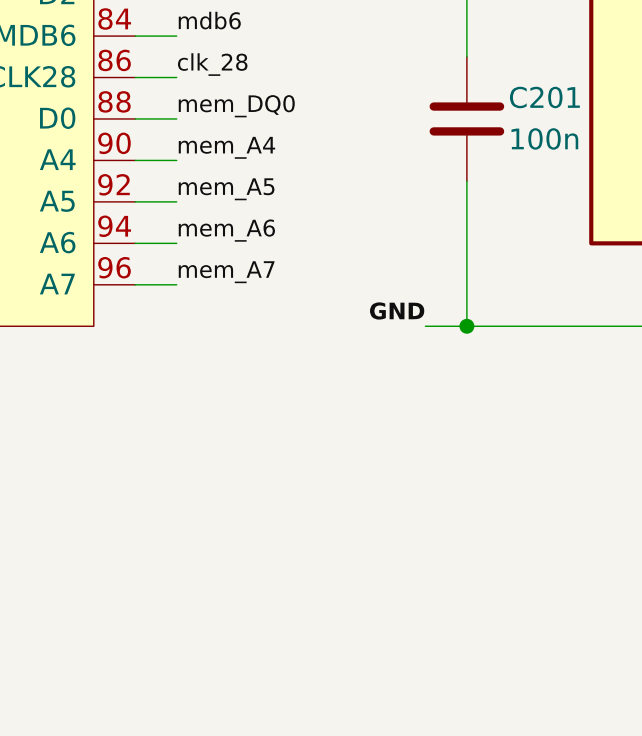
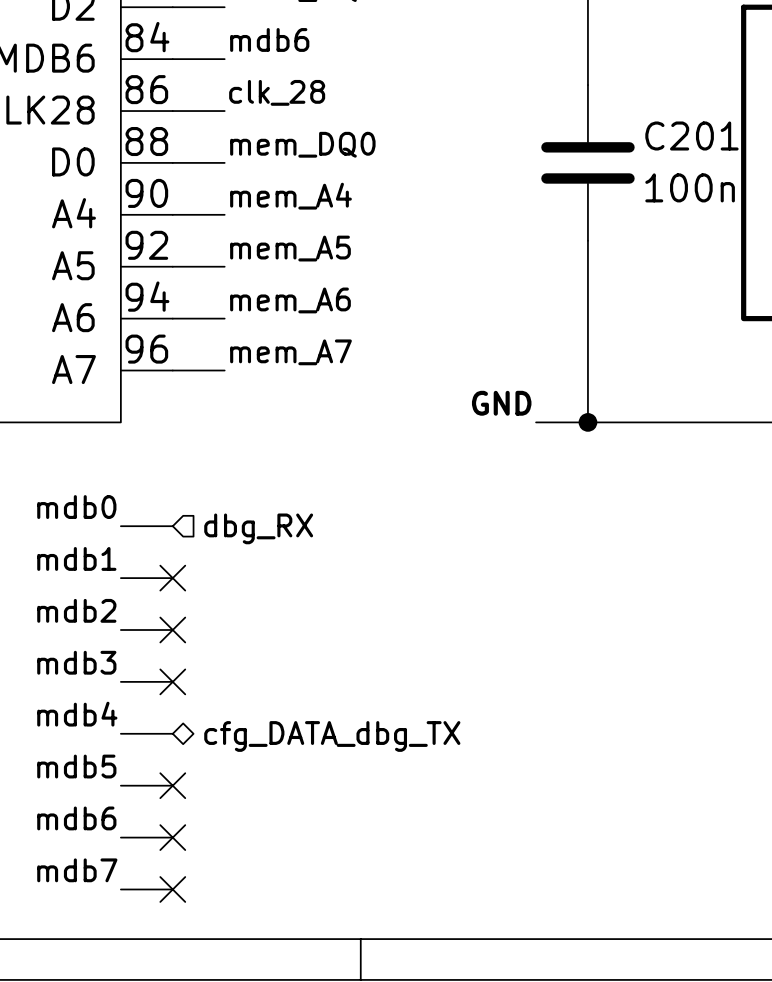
label: none -> mdb0 (76, 507)
wire: none -> (120, 526) (172, 526)
hierarchical label: none -> dbg_RX (258, 528)
label: none -> mdb1 (76, 558)
wire: none -> (120, 578) (172, 578)
no-connect mark: none -> (172, 578)
label: none -> mdb2 (76, 610)
wire: none -> (120, 630) (172, 630)
no-connect mark: none -> (172, 630)
label: none -> mdb3 (76, 662)
wire: none -> (120, 681) (172, 681)
no-connect mark: none -> (172, 681)
label: none -> mdb4 (77, 714)
wire: none -> (120, 733) (172, 733)
hierarchical label: none -> cfg_DATA_dbg_TX (332, 736)
label: none -> mdb5 (76, 766)
wire: none -> (120, 785) (172, 785)
no-connect mark: none -> (172, 785)
label: none -> mdb6 (76, 818)
wire: none -> (120, 837) (172, 837)
no-connect mark: none -> (172, 837)
label: none -> mdb7 (77, 870)
wire: none -> (120, 889) (172, 889)
no-connect mark: none -> (172, 889)

